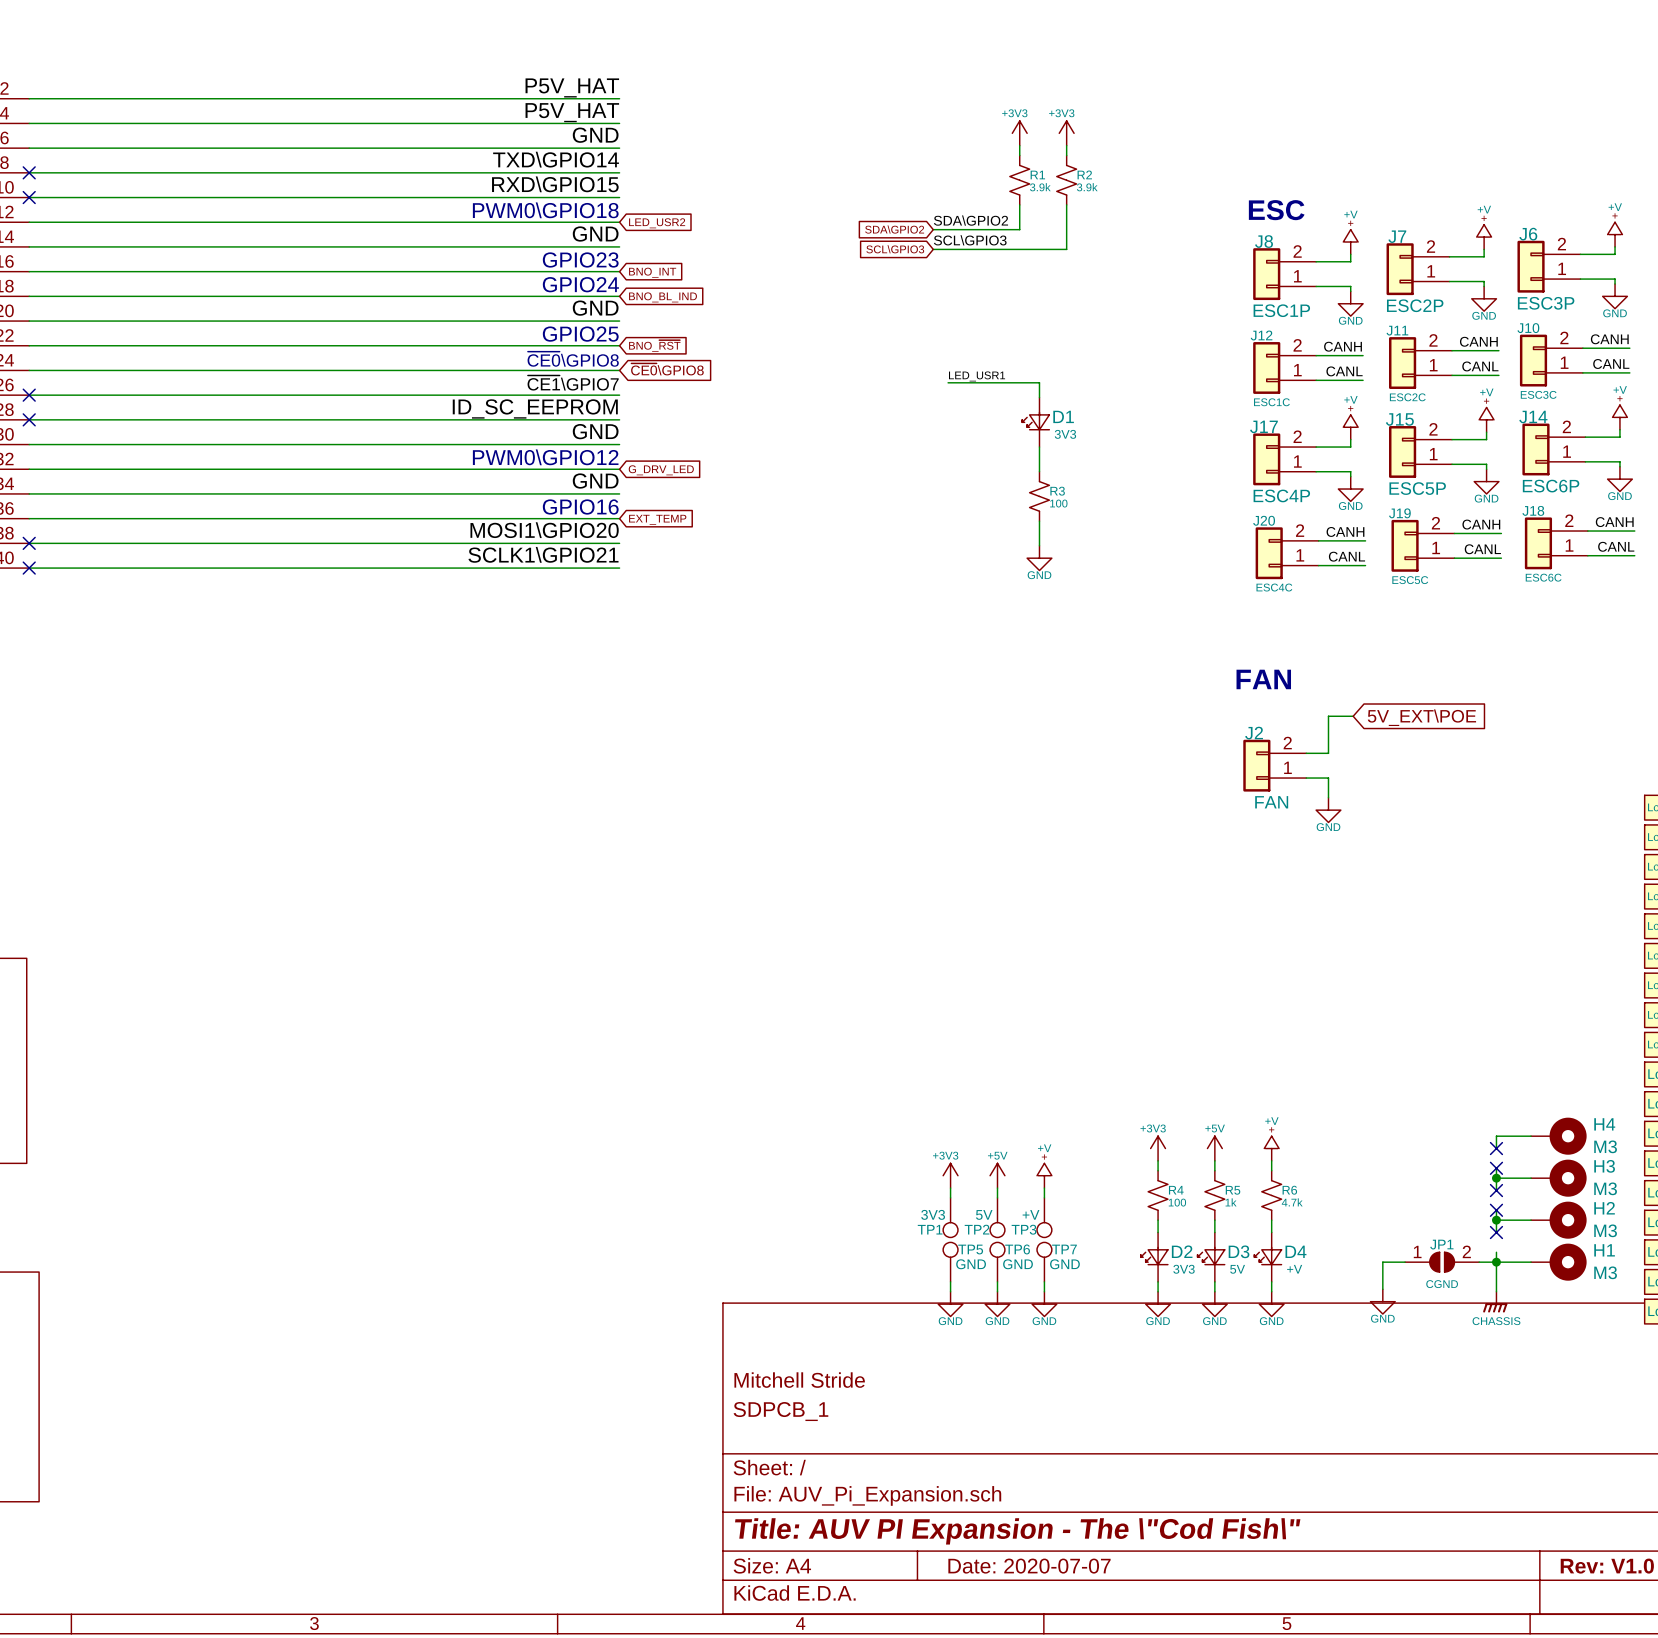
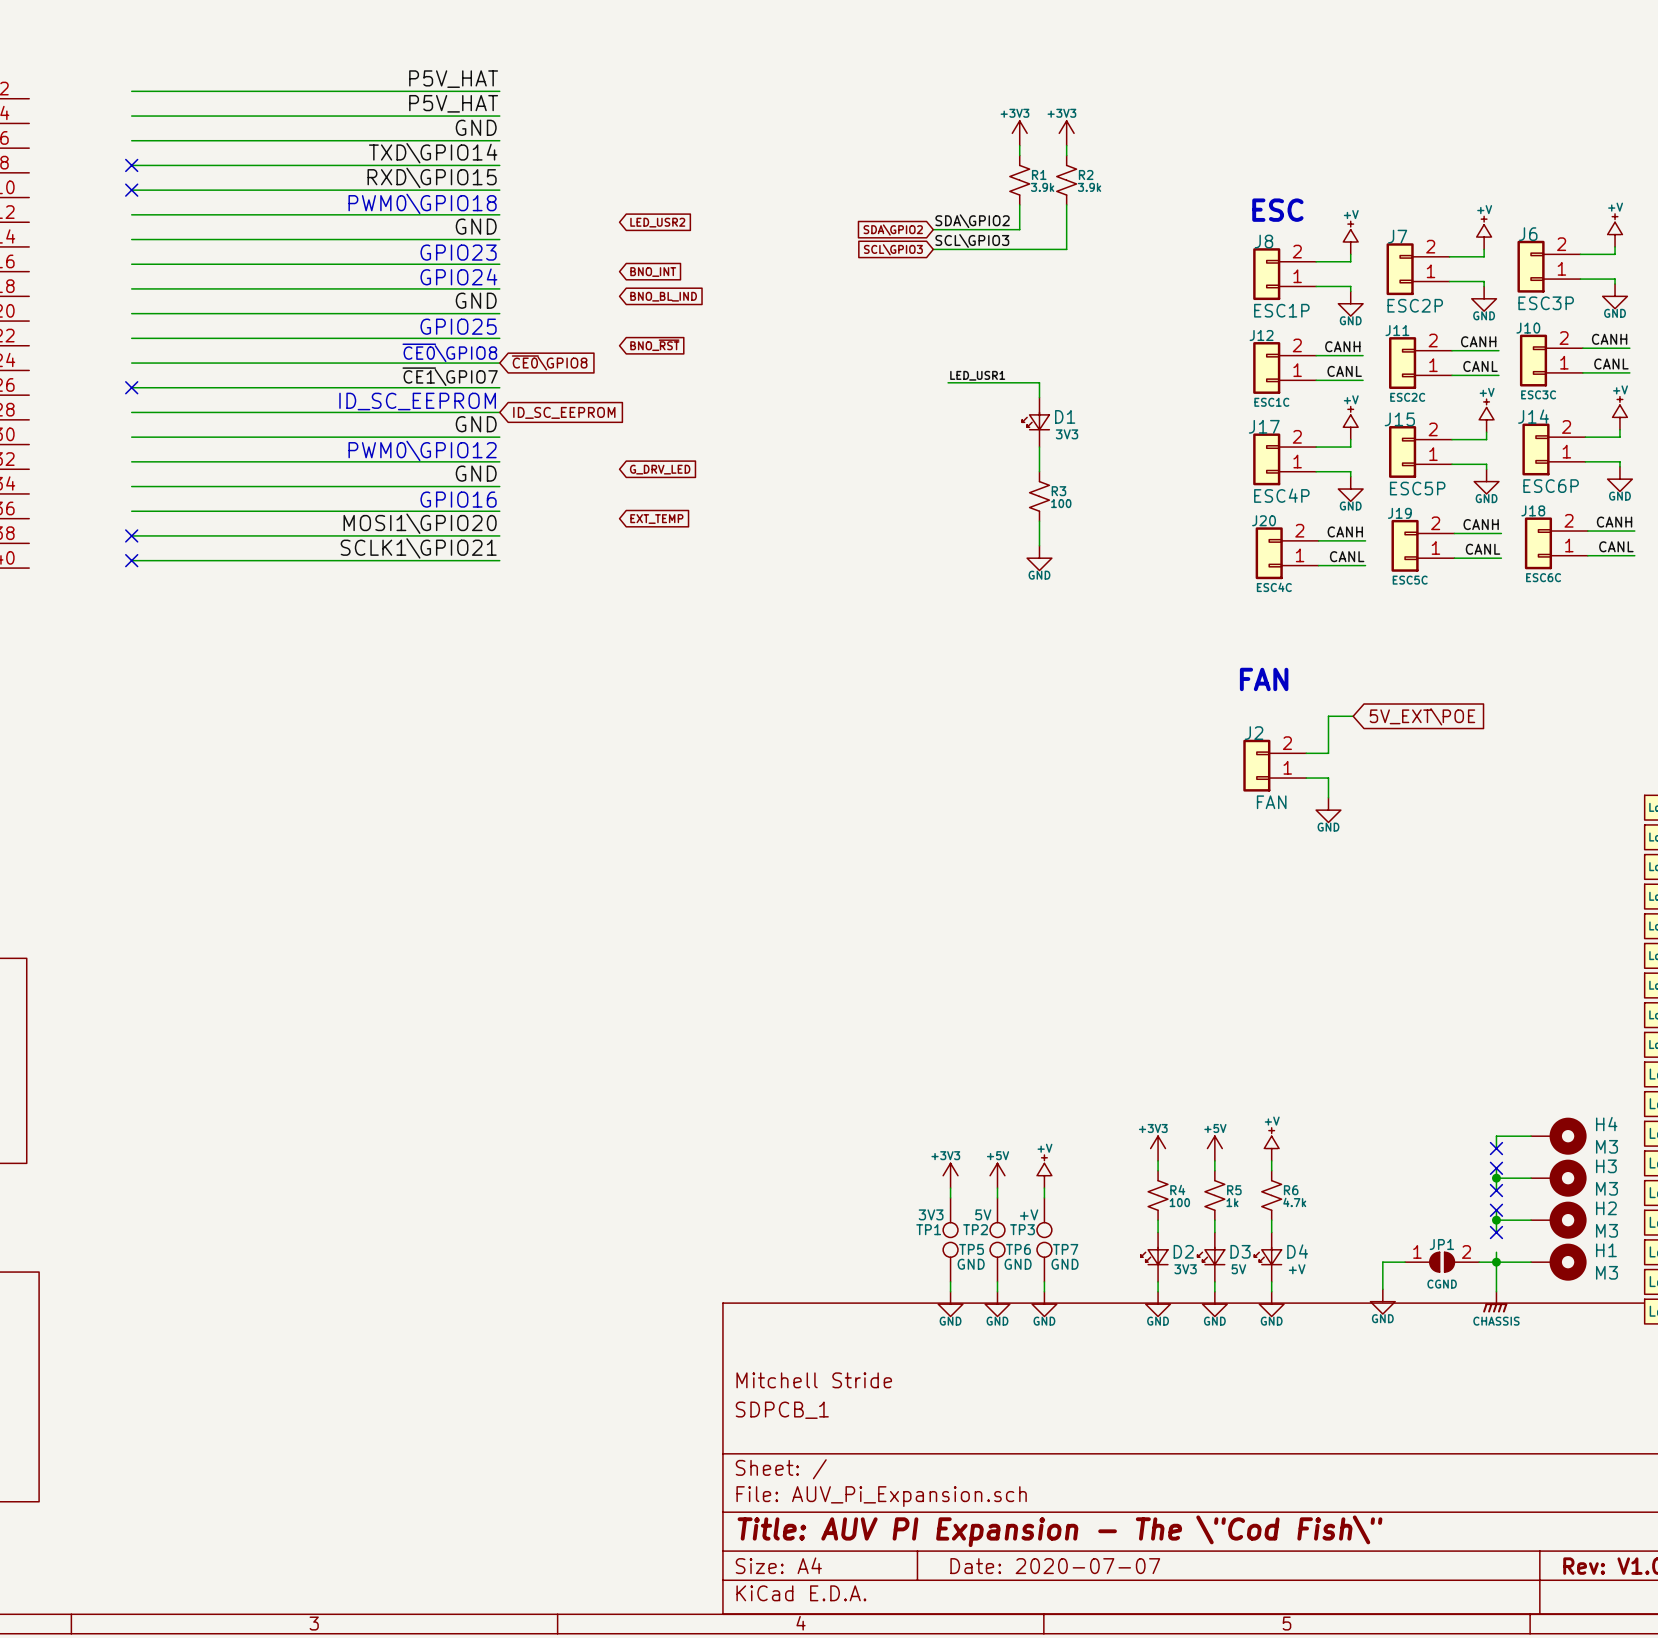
label: none -> P5V_HAT (453, 79)
label: P5V_HAT (572, 87) -> none
wire: none -> (131, 91) (499, 91)
wire: (29, 98) (619, 98) -> none
label: none -> P5V_HAT (453, 103)
label: P5V_HAT (572, 112) -> none
wire: none -> (131, 116) (499, 116)
wire: (29, 123) (619, 123) -> none
label: none -> GND (476, 127)
label: GND (595, 135) -> none
wire: none -> (131, 140) (499, 140)
wire: (29, 148) (619, 148) -> none
label position: TXD\GPIO14 (556, 159) -> TXD\GPIO14 (433, 153)
wire: none -> (131, 165) (499, 165)
no-connect mark: none -> (131, 165)
wire: (29, 172) (619, 172) -> none
no-connect mark: (29, 172) -> none
label position: RXD\GPIO15 (555, 184) -> RXD\GPIO15 (432, 177)
wire: none -> (131, 190) (499, 190)
no-connect mark: none -> (131, 190)
wire: (29, 197) (619, 197) -> none
no-connect mark: (29, 197) -> none
text position: PWM0\GPIO18 (545, 210) -> PWM0\GPIO18 (422, 203)
wire: none -> (131, 214) (499, 214)
wire: (29, 222) (619, 222) -> none
label: none -> GND (476, 226)
label: GND (595, 234) -> none
wire: none -> (131, 239) (499, 239)
wire: (29, 246) (619, 246) -> none
text position: GPIO23 (580, 259) -> GPIO23 (458, 252)
wire: none -> (131, 264) (499, 264)
wire: (29, 271) (619, 271) -> none
text position: GPIO24 (580, 284) -> GPIO24 (458, 276)
wire: none -> (131, 288) (499, 288)
wire: (29, 296) (619, 296) -> none
label: none -> GND (476, 300)
label: GND (595, 308) -> none
wire: none -> (131, 313) (499, 313)
wire: (29, 321) (619, 321) -> none
text position: GPIO25 (580, 334) -> GPIO25 (458, 326)
wire: none -> (131, 338) (499, 338)
wire: (29, 345) (619, 345) -> none
text position: ~{CE0}\GPIO8 (573, 359) -> ~{CE0}\GPIO8 (449, 352)
wire: none -> (131, 363) (499, 363)
global label position: ~{CE0}\GPIO8 (667, 369) -> ~{CE0}\GPIO8 (549, 362)
wire: (29, 370) (619, 370) -> none
label position: ~{CE1}\GPIO7 (573, 383) -> ~{CE1}\GPIO7 (450, 376)
wire: none -> (131, 387) (499, 387)
no-connect mark: none -> (131, 387)
wire: (29, 395) (619, 395) -> none
no-connect mark: (29, 395) -> none
text: none -> ID_SC_EEPROM (417, 401)
label: ID_SC_EEPROM (535, 408) -> none
wire: none -> (131, 412) (499, 412)
global label: none -> ID_SC_EEPROM (564, 412)
wire: (29, 419) (619, 419) -> none
no-connect mark: (29, 419) -> none
label: none -> GND (476, 424)
label: GND (595, 431) -> none
wire: none -> (131, 437) (499, 437)
wire: (29, 444) (619, 444) -> none
text position: PWM0\GPIO12 (545, 457) -> PWM0\GPIO12 (422, 450)
wire: none -> (131, 461) (499, 461)
wire: (29, 469) (619, 469) -> none
label: none -> GND (476, 473)
label: GND (595, 481) -> none
wire: none -> (131, 486) (499, 486)
wire: (29, 493) (619, 493) -> none
text position: GPIO16 (580, 507) -> GPIO16 (458, 499)
wire: none -> (131, 511) (499, 511)
wire: (29, 518) (619, 518) -> none
label position: MOSI1\GPIO20 (544, 530) -> MOSI1\GPIO20 (420, 523)
wire: none -> (131, 535) (499, 535)
no-connect mark: none -> (131, 535)
wire: (29, 543) (619, 543) -> none
no-connect mark: (29, 543) -> none
label position: SCLK1\GPIO21 (543, 554) -> SCLK1\GPIO21 (418, 548)
wire: none -> (131, 560) (499, 560)
no-connect mark: none -> (131, 560)
wire: (29, 568) (619, 568) -> none
no-connect mark: (29, 568) -> none

